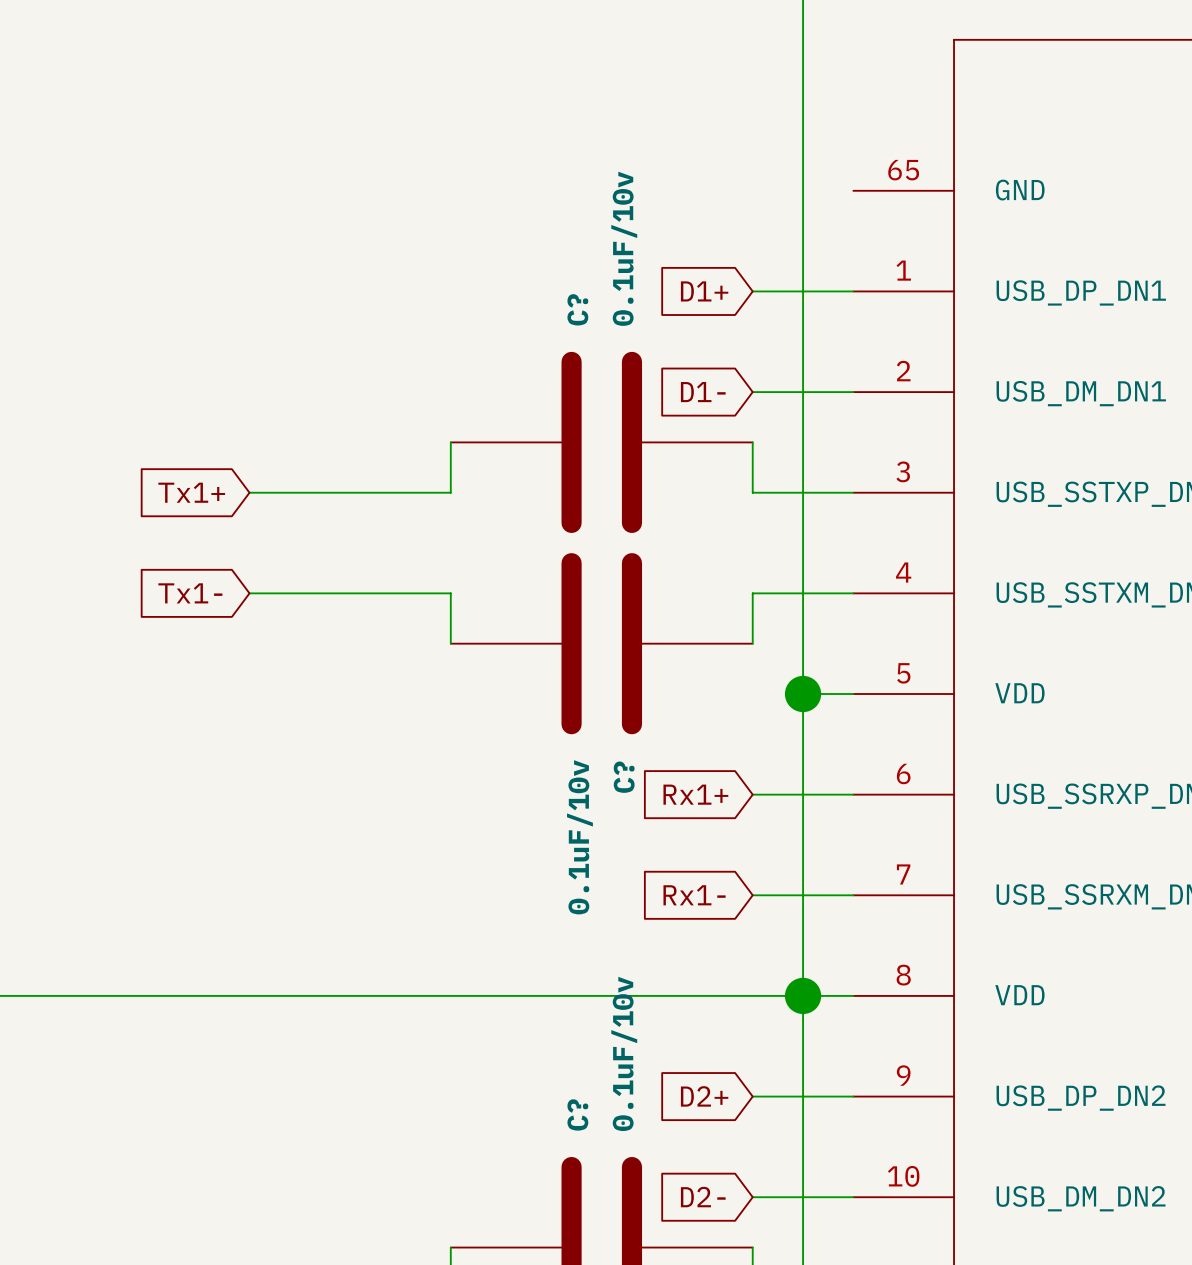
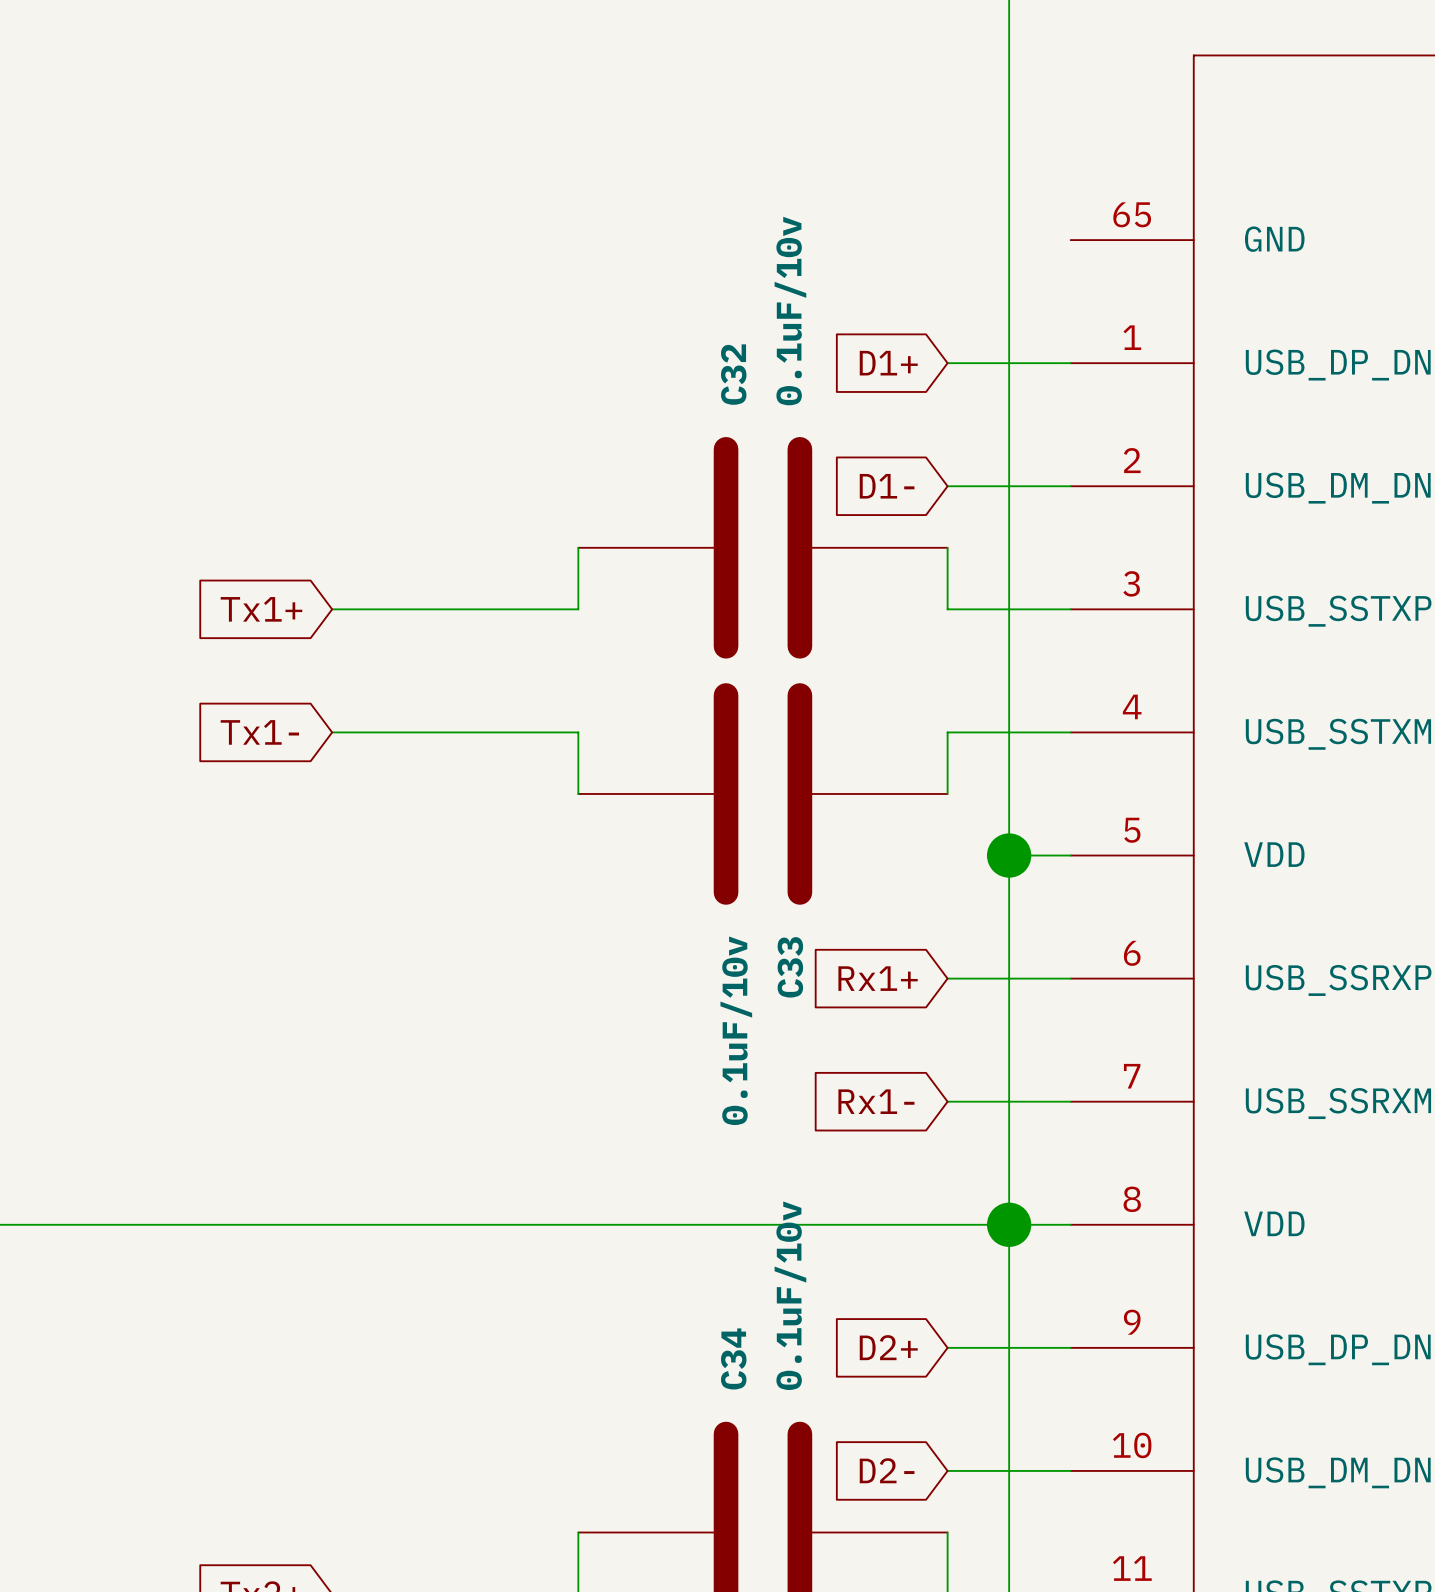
C? name: C? (577, 309) -> C32 (733, 374)
C? name: C? (624, 777) -> C33 (790, 967)
C? name: C? (577, 1114) -> C34 (733, 1358)

